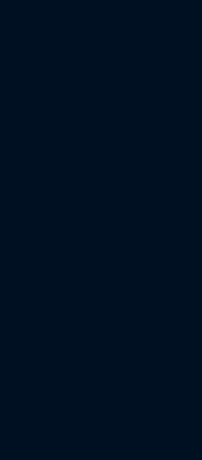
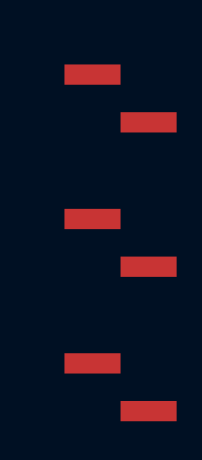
part: none -> (120, 98)
part: none -> (120, 242)
part: none -> (120, 387)

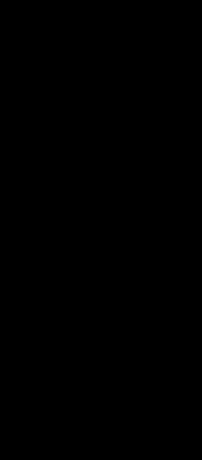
part: (120, 98) -> none
part: (120, 242) -> none
part: (120, 387) -> none

